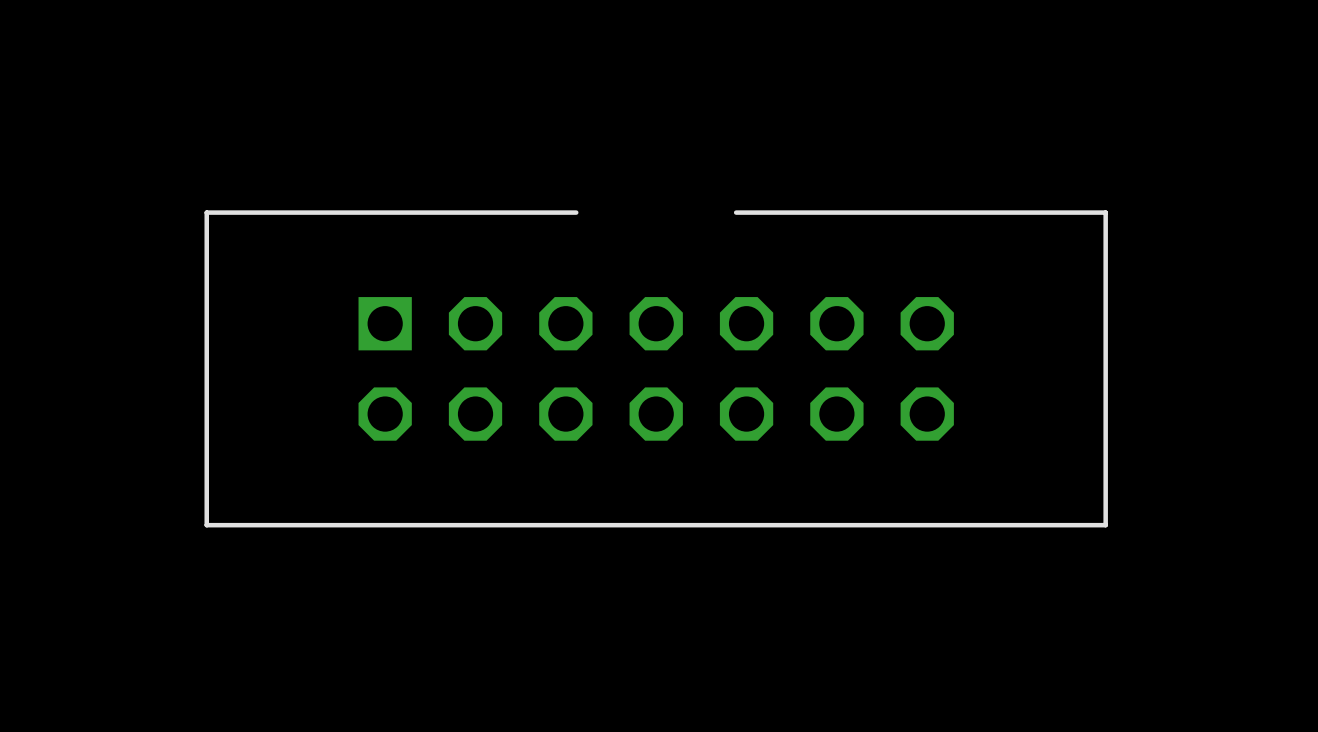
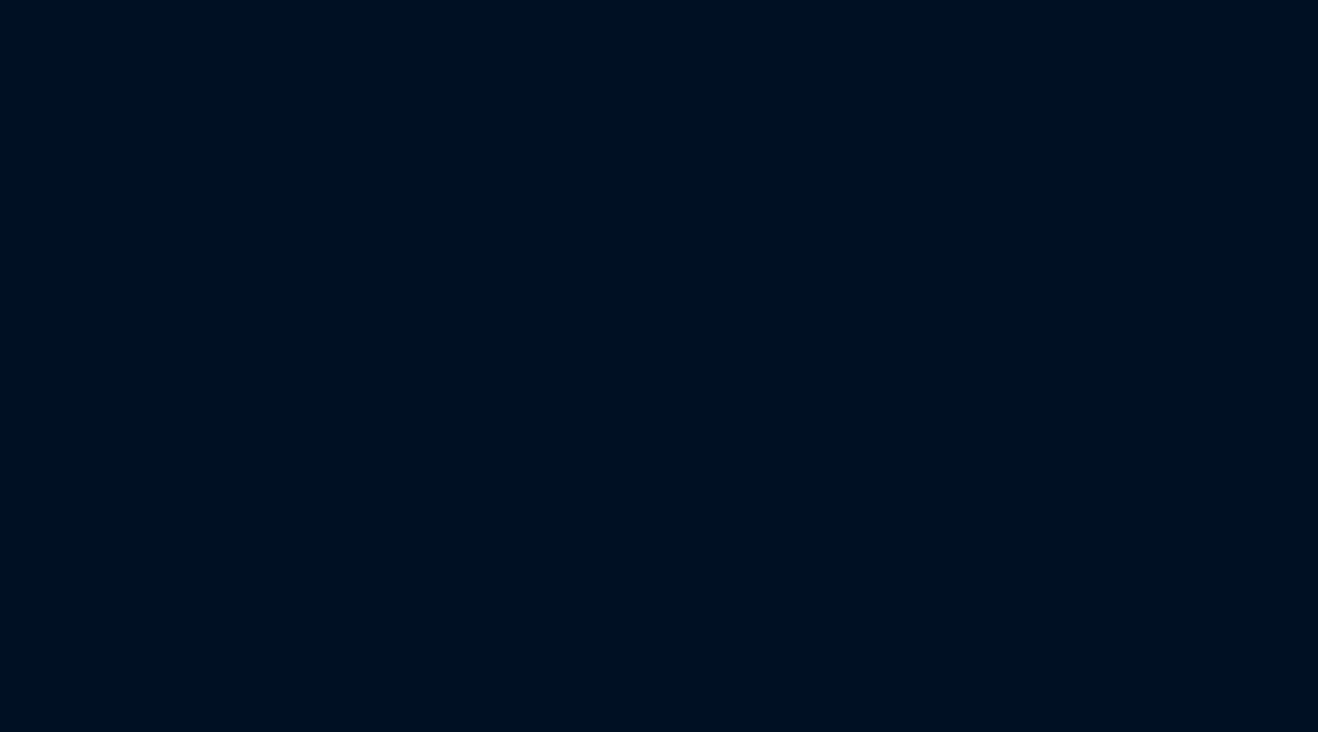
part: (656, 368) -> none

